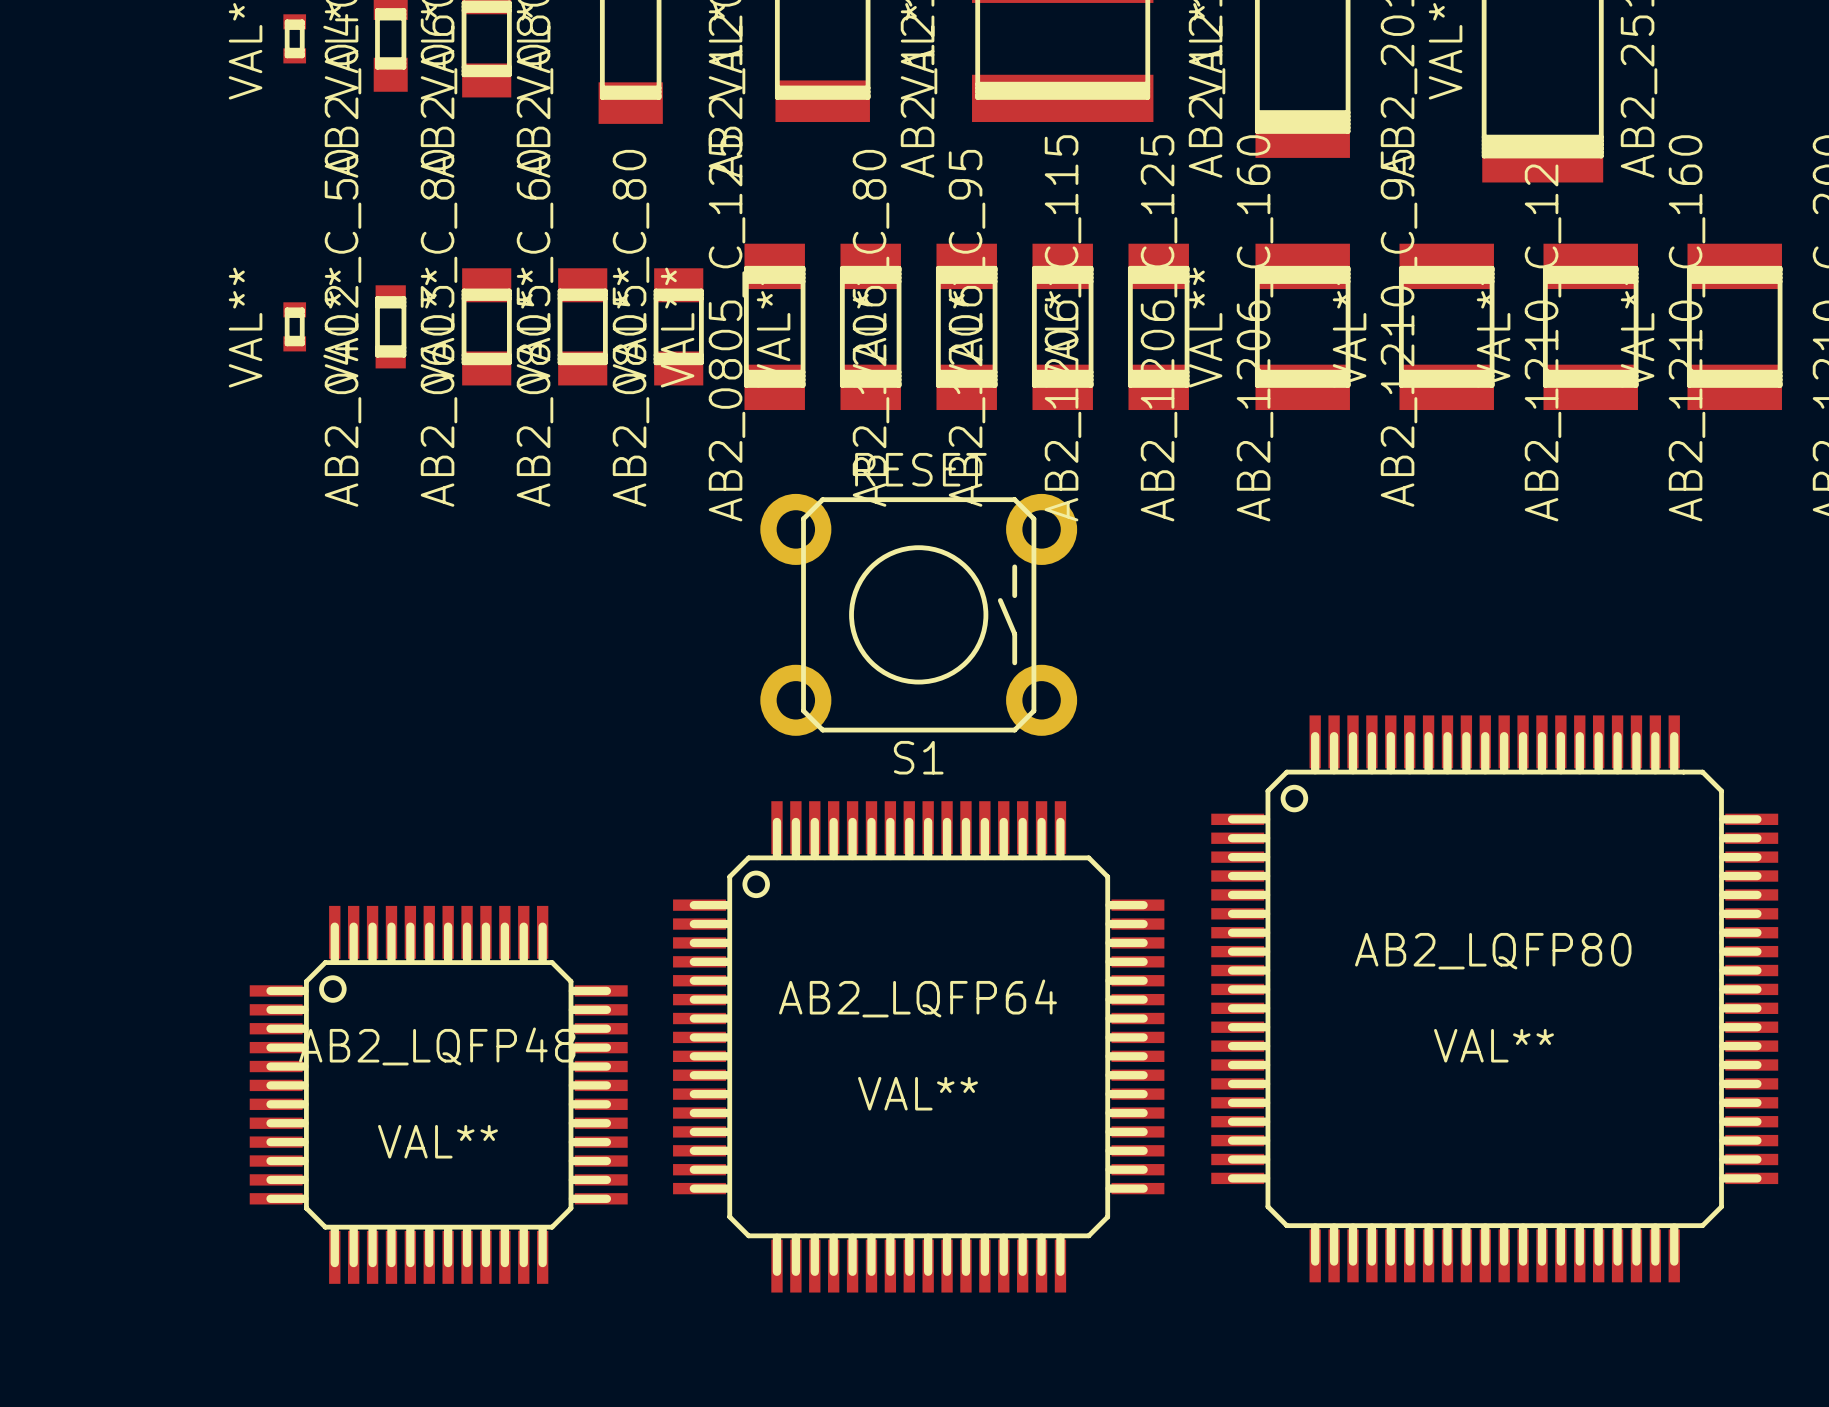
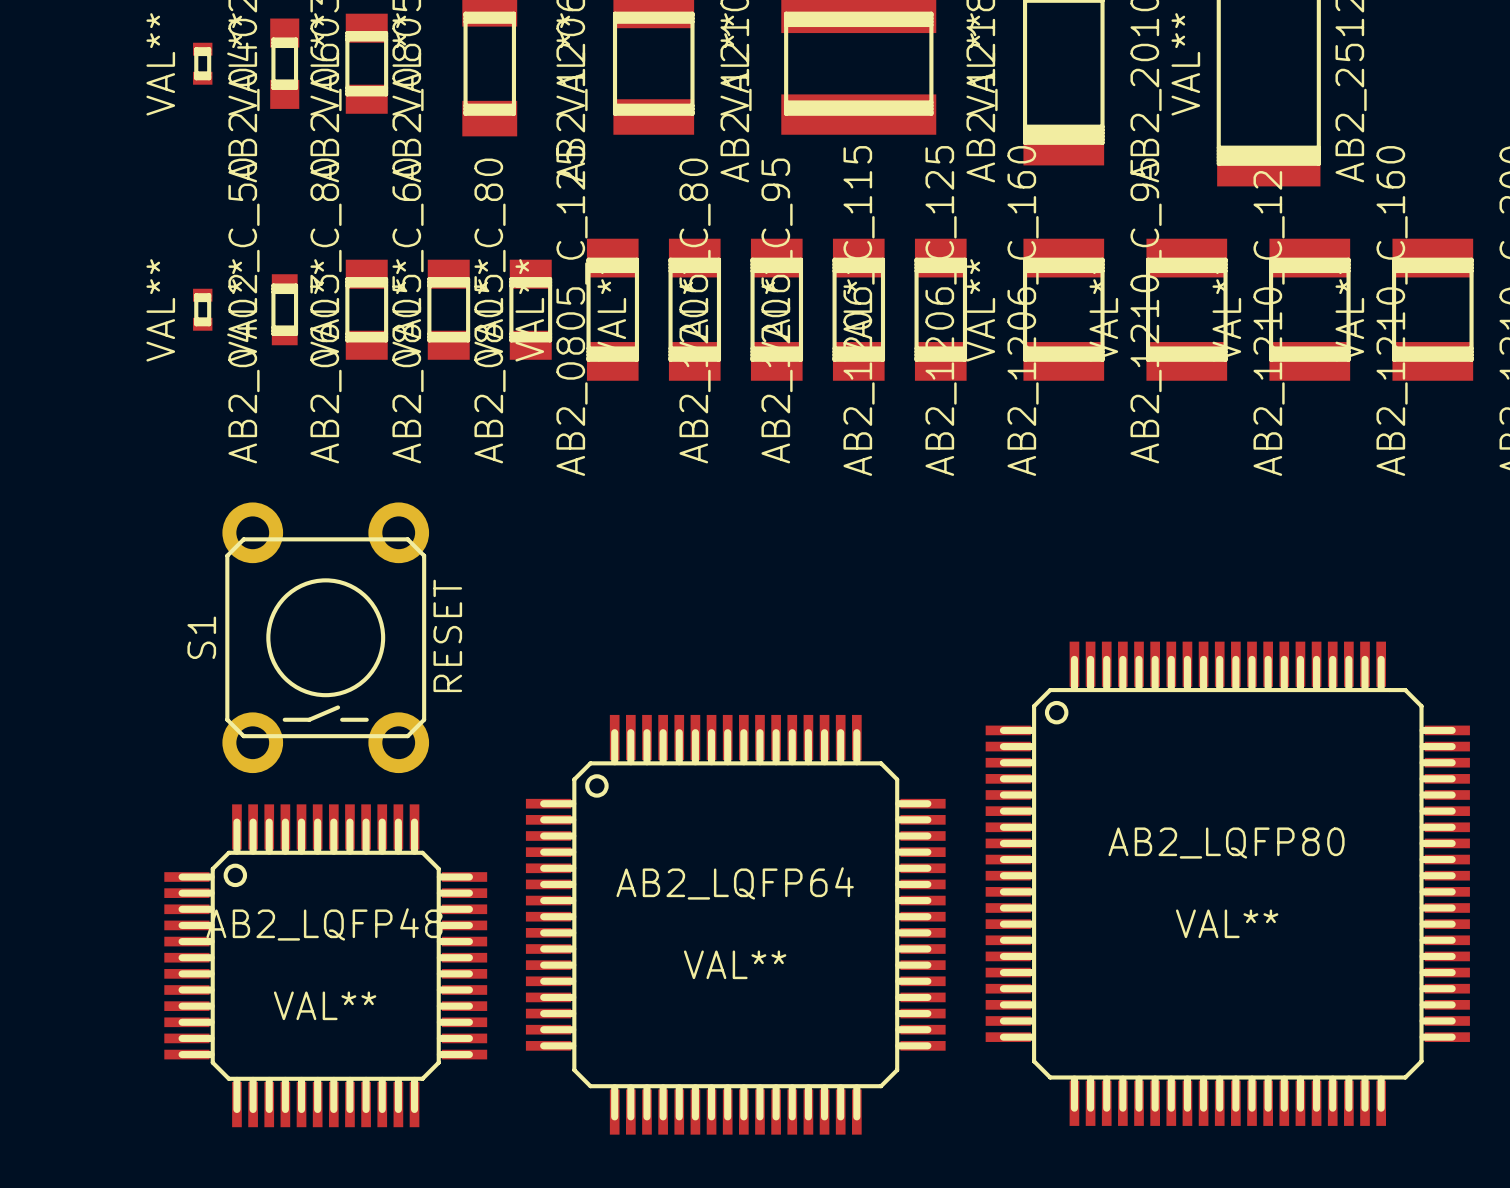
S1 rotation: 0° (918, 614) -> 90° clockwise (325, 637)
S1 position: (918, 614) -> (325, 637)

